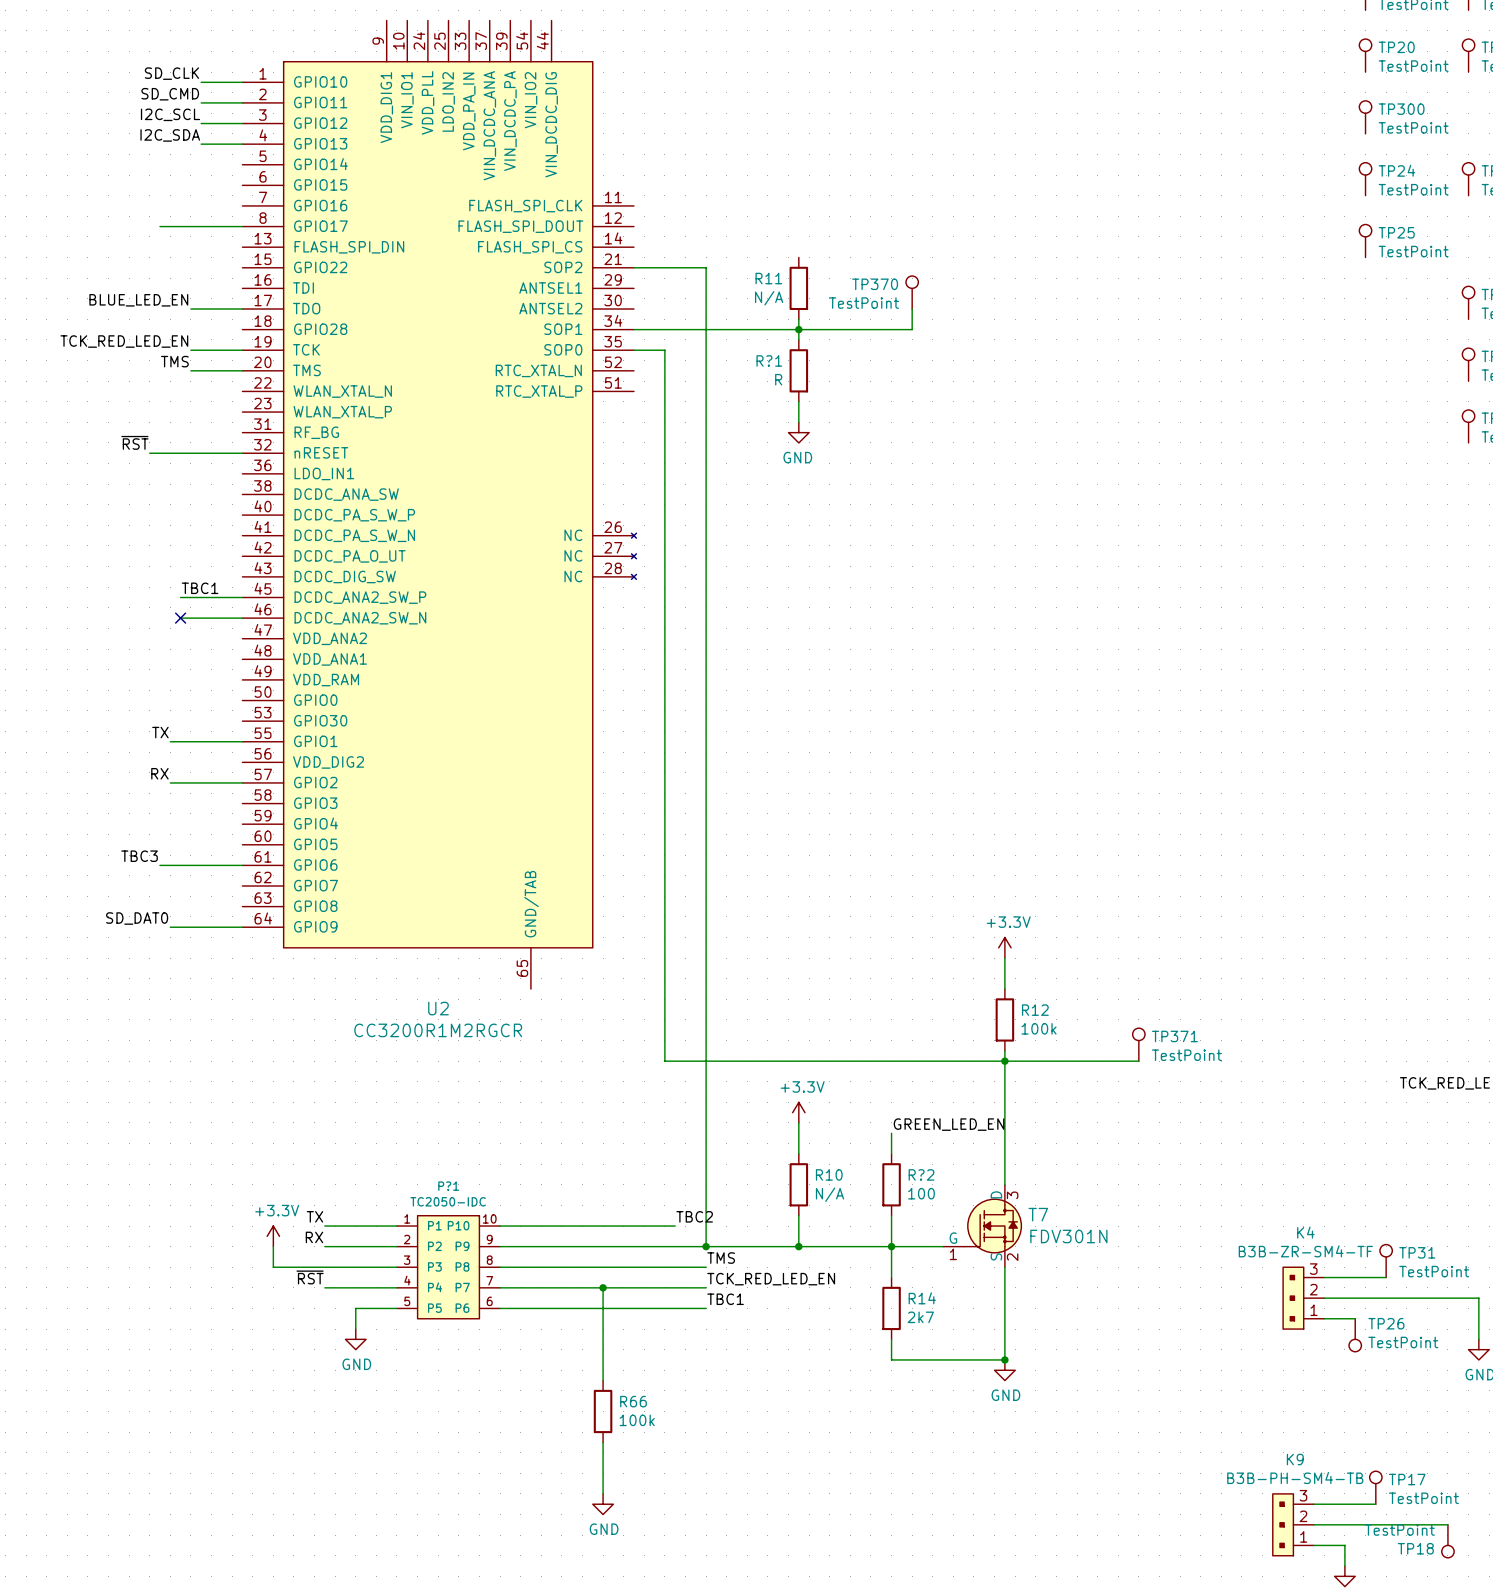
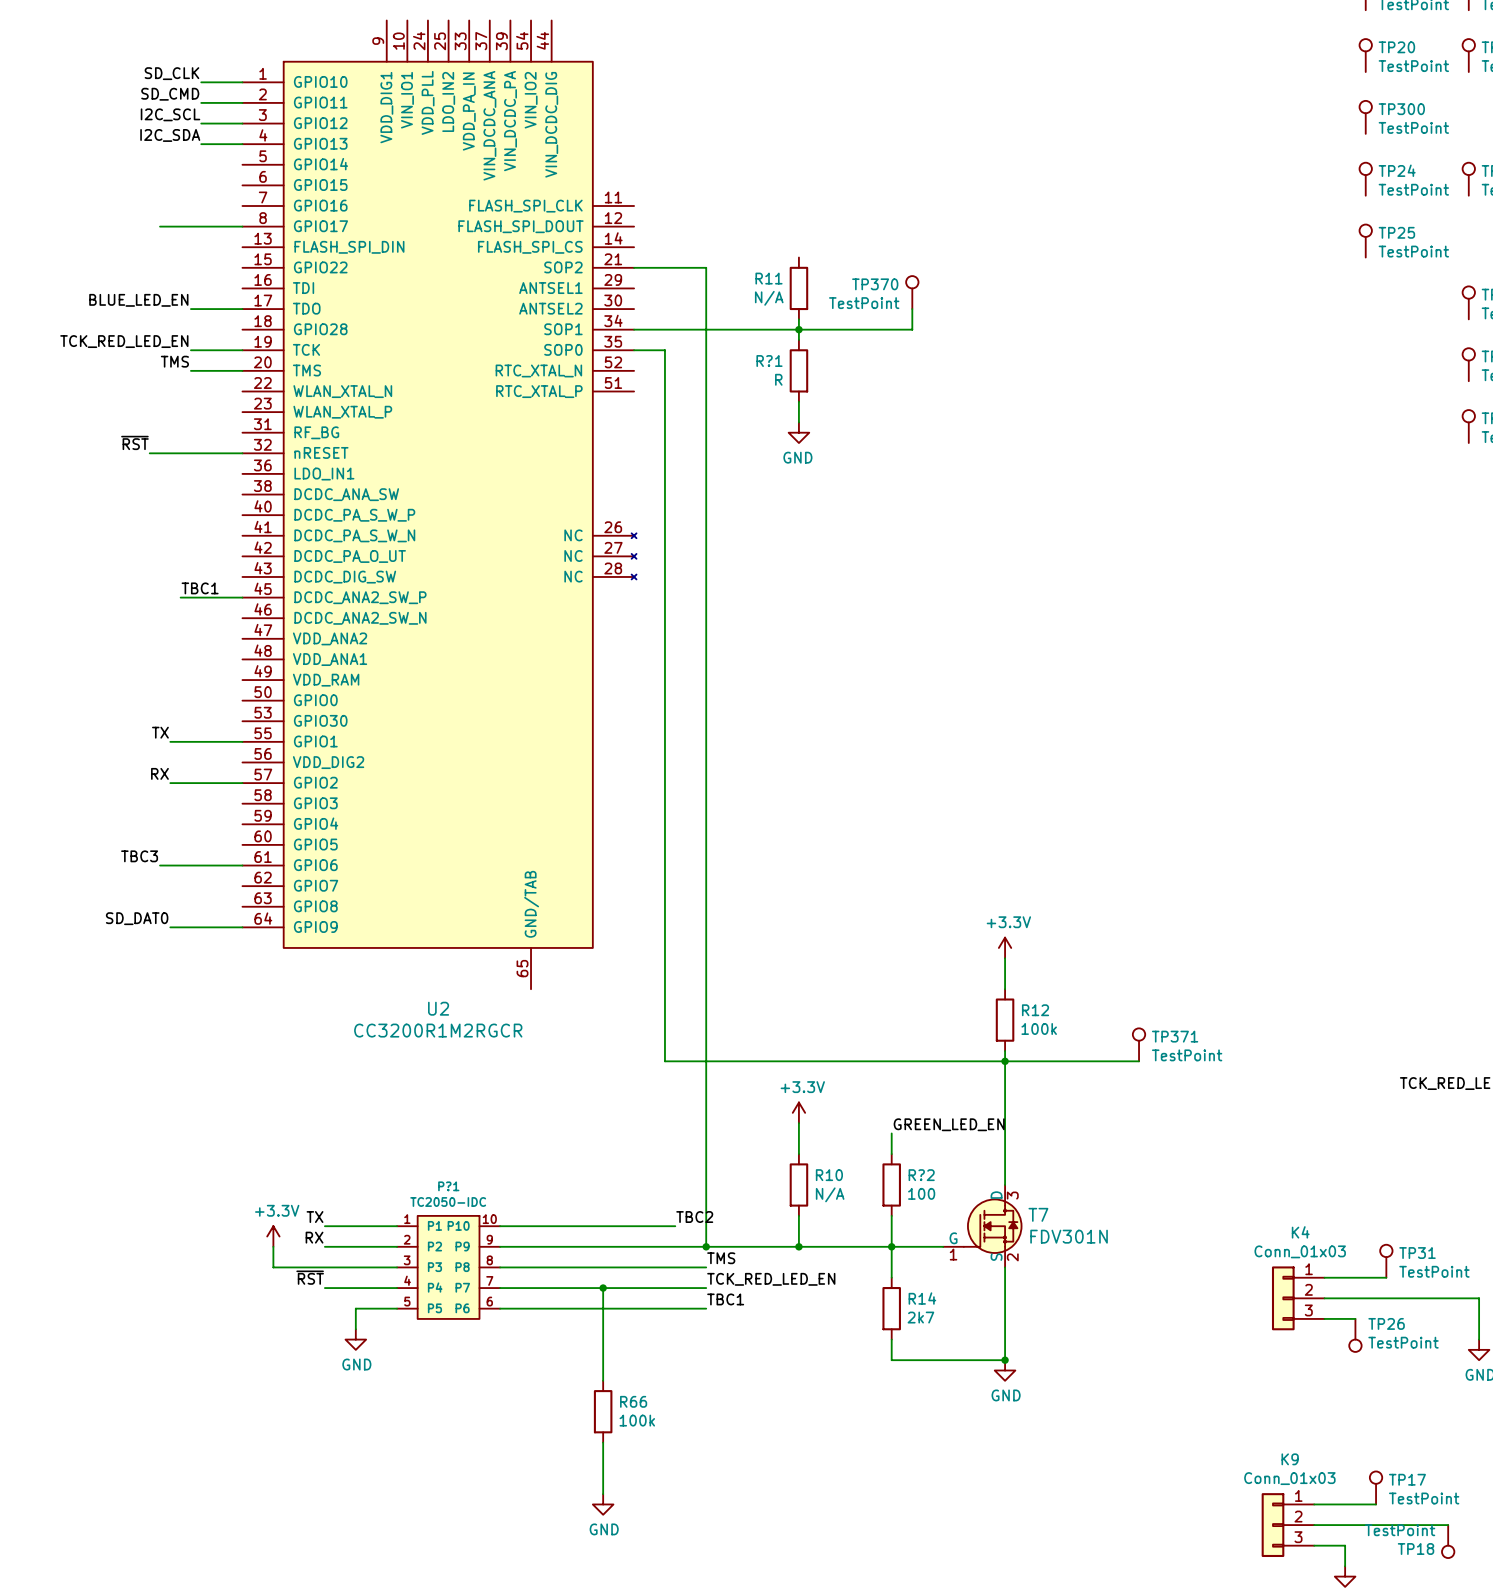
wire: (180, 618) (242, 618) -> none
no-connect mark: (180, 618) -> none
K4 value: B3B-ZR-SM4-TF (1305, 1251) -> Conn_01x03 (1300, 1251)
K4 symbol: [1283, 1267, 1325, 1330] -> [1271, 1266, 1325, 1331]
K9 value: B3B-PH-SM4-TB (1295, 1478) -> Conn_01x03 (1289, 1478)
K9 symbol: [1272, 1493, 1315, 1556] -> [1261, 1493, 1315, 1558]

